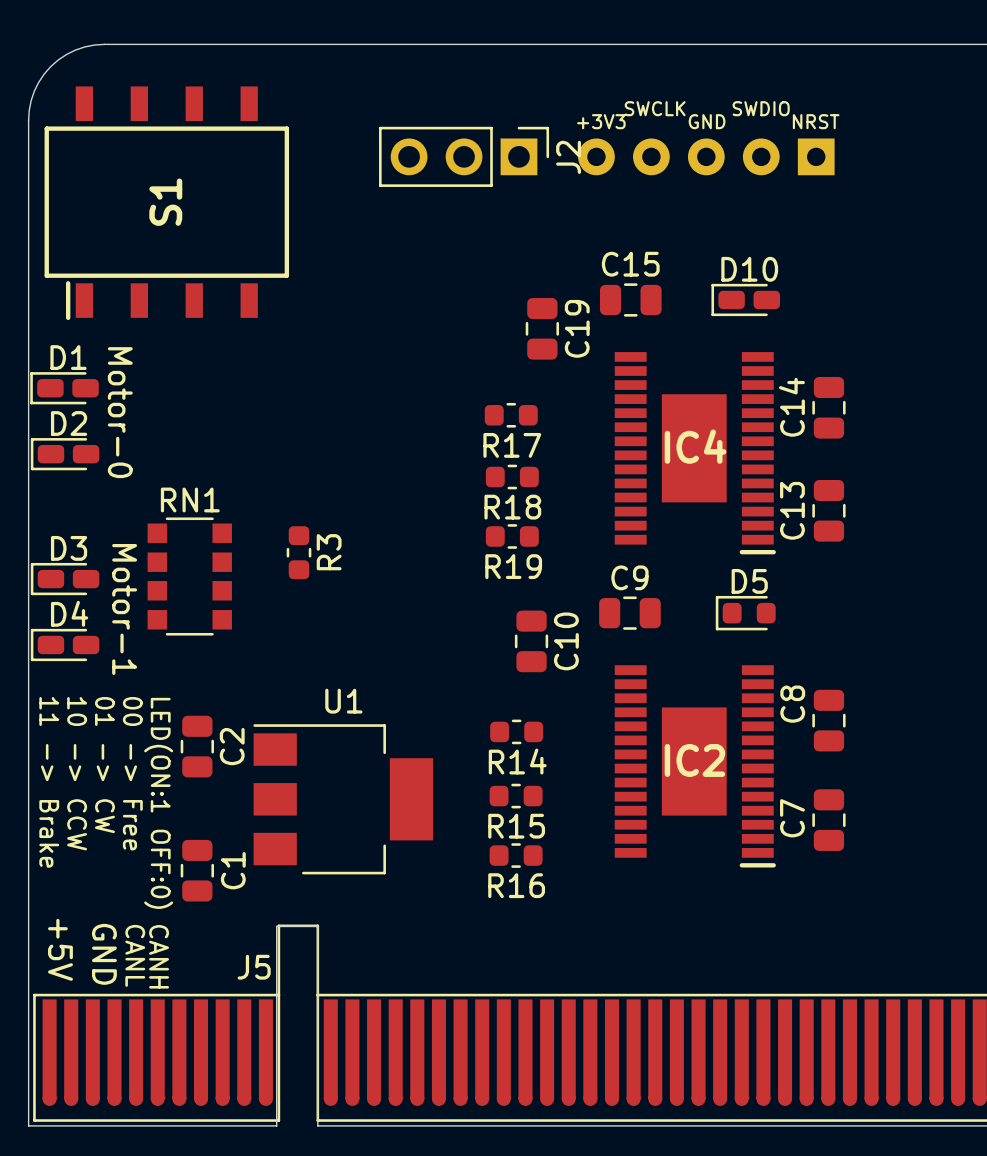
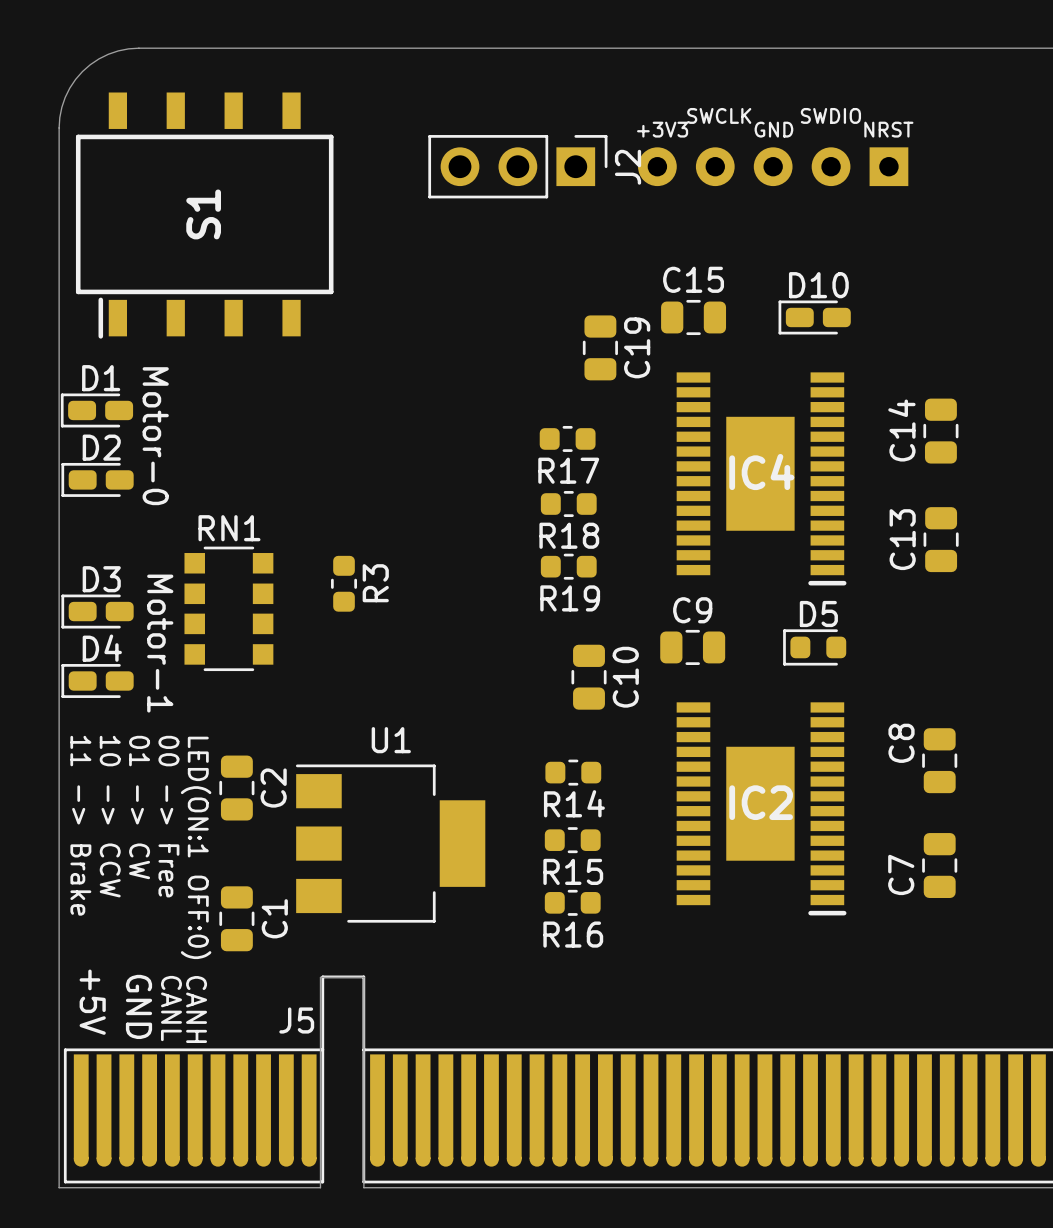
C14 position: (828, 407) -> (940, 431)
C13 position: (828, 510) -> (941, 539)
C8 position: (828, 720) -> (939, 760)
C7 name position: C7 (792, 818) -> C7 (901, 874)
C7 position: (828, 820) -> (939, 865)

